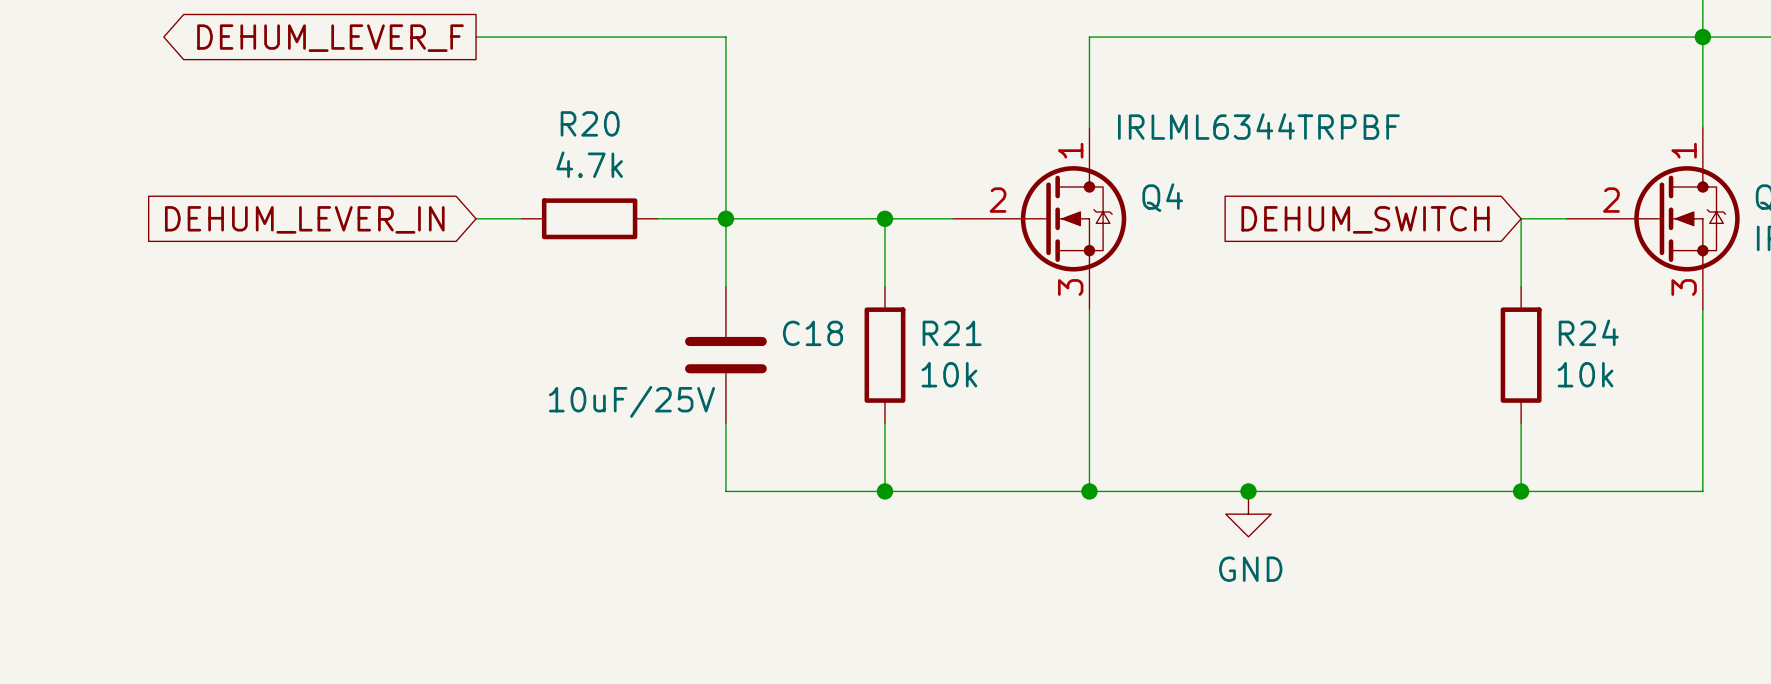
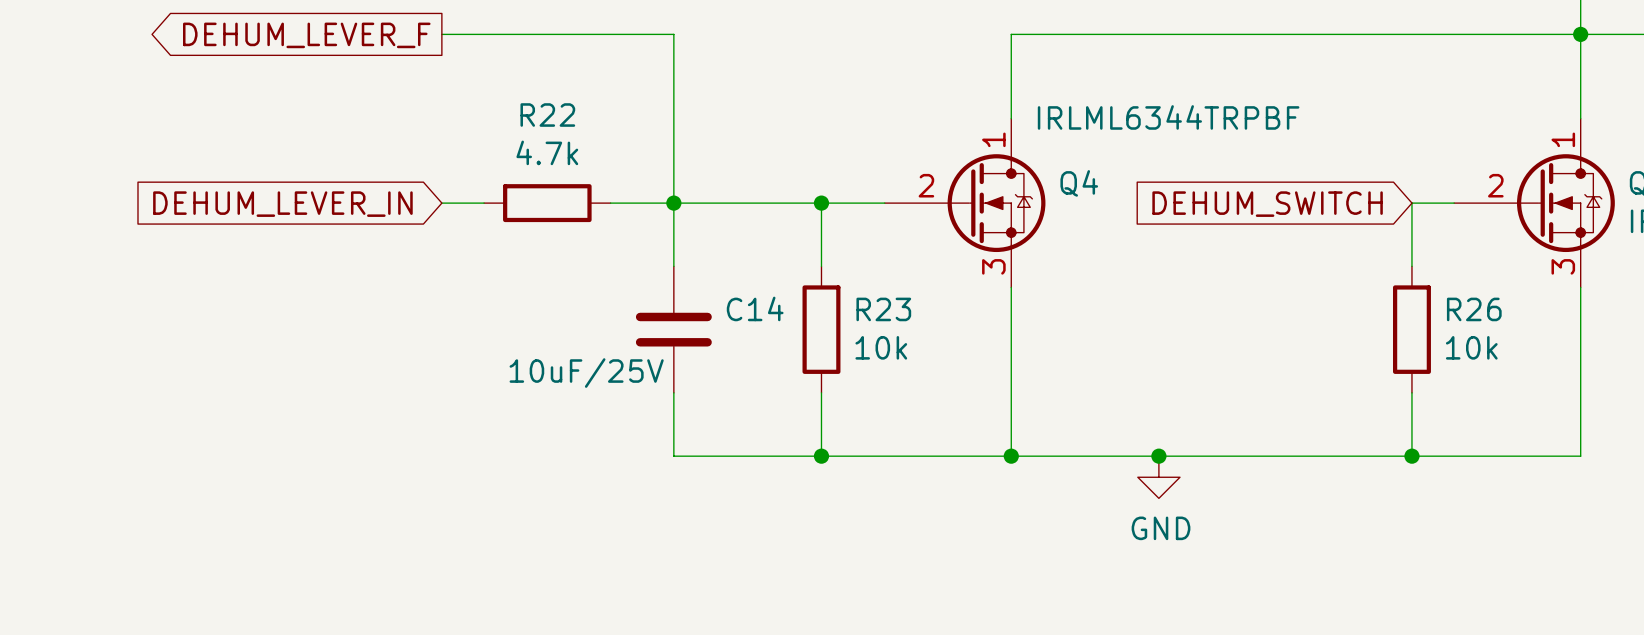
R20 name: R20 (590, 123) -> R22 (547, 115)
R24 name: R24 (1588, 332) -> R26 (1474, 309)
C18 name: C18 (812, 333) -> C14 (755, 308)
R21 name: R21 (952, 333) -> R23 (883, 309)

